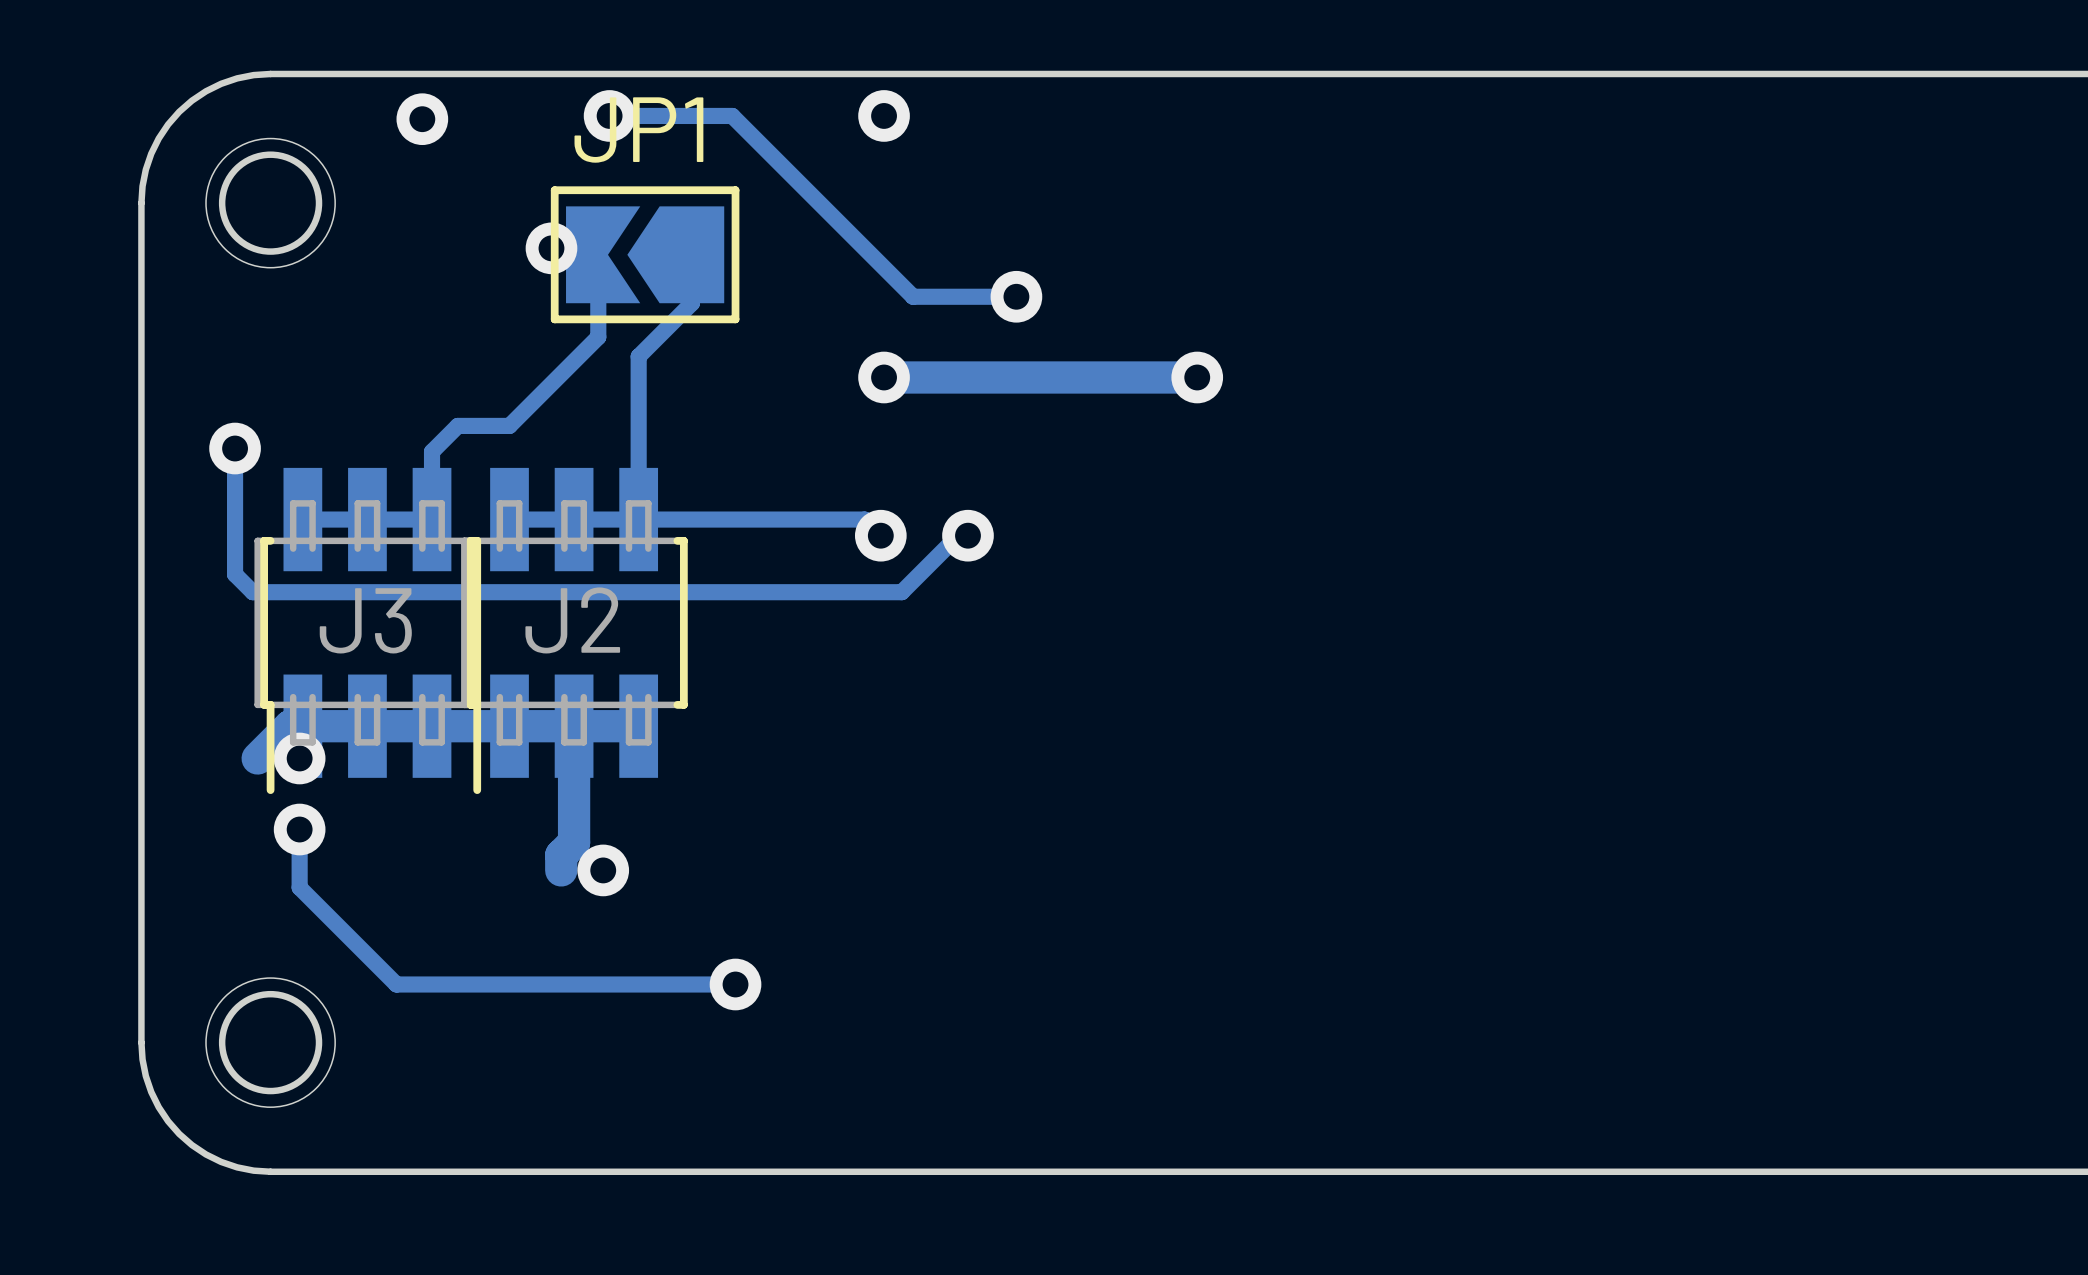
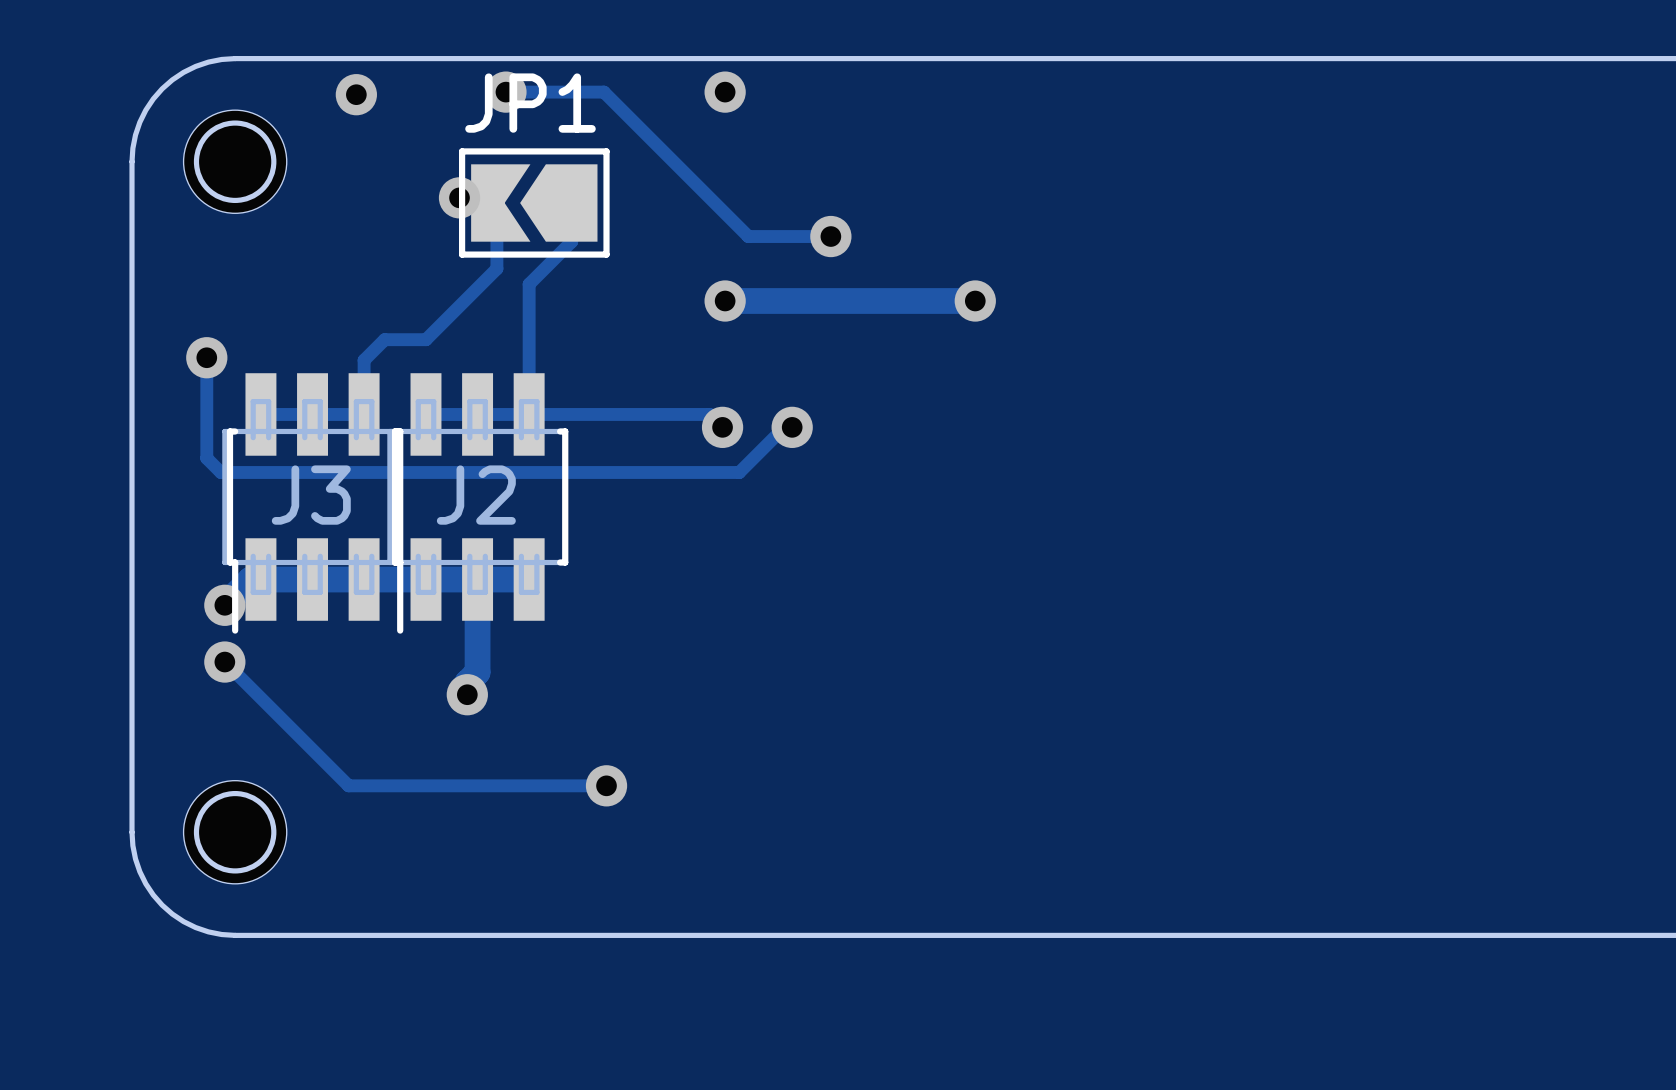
via position: (299, 758) -> (224, 605)
track: (299, 829) (299, 887) (396, 984) (412, 984) -> (224, 662) (348, 785)
via position: (299, 829) -> (224, 662)
via position: (603, 870) -> (467, 694)

